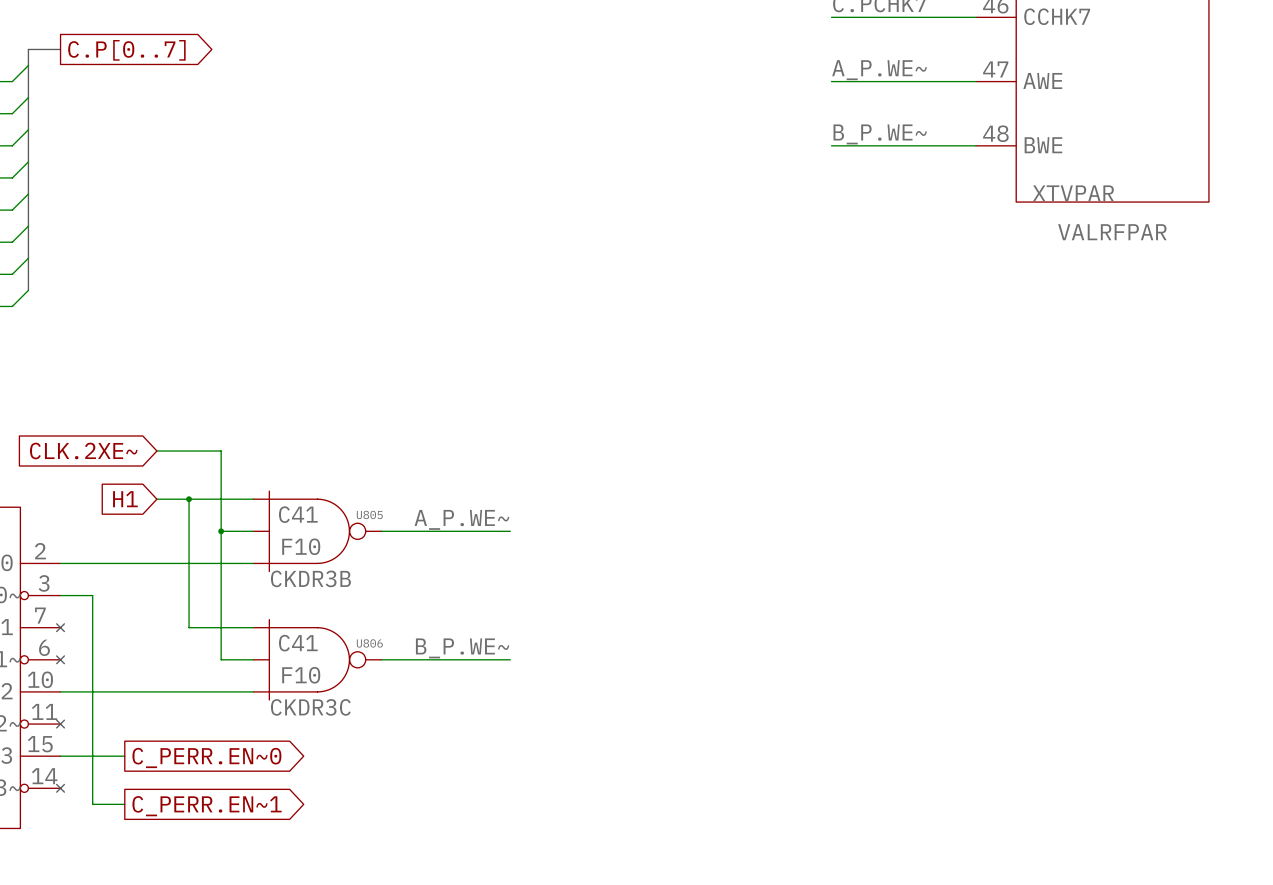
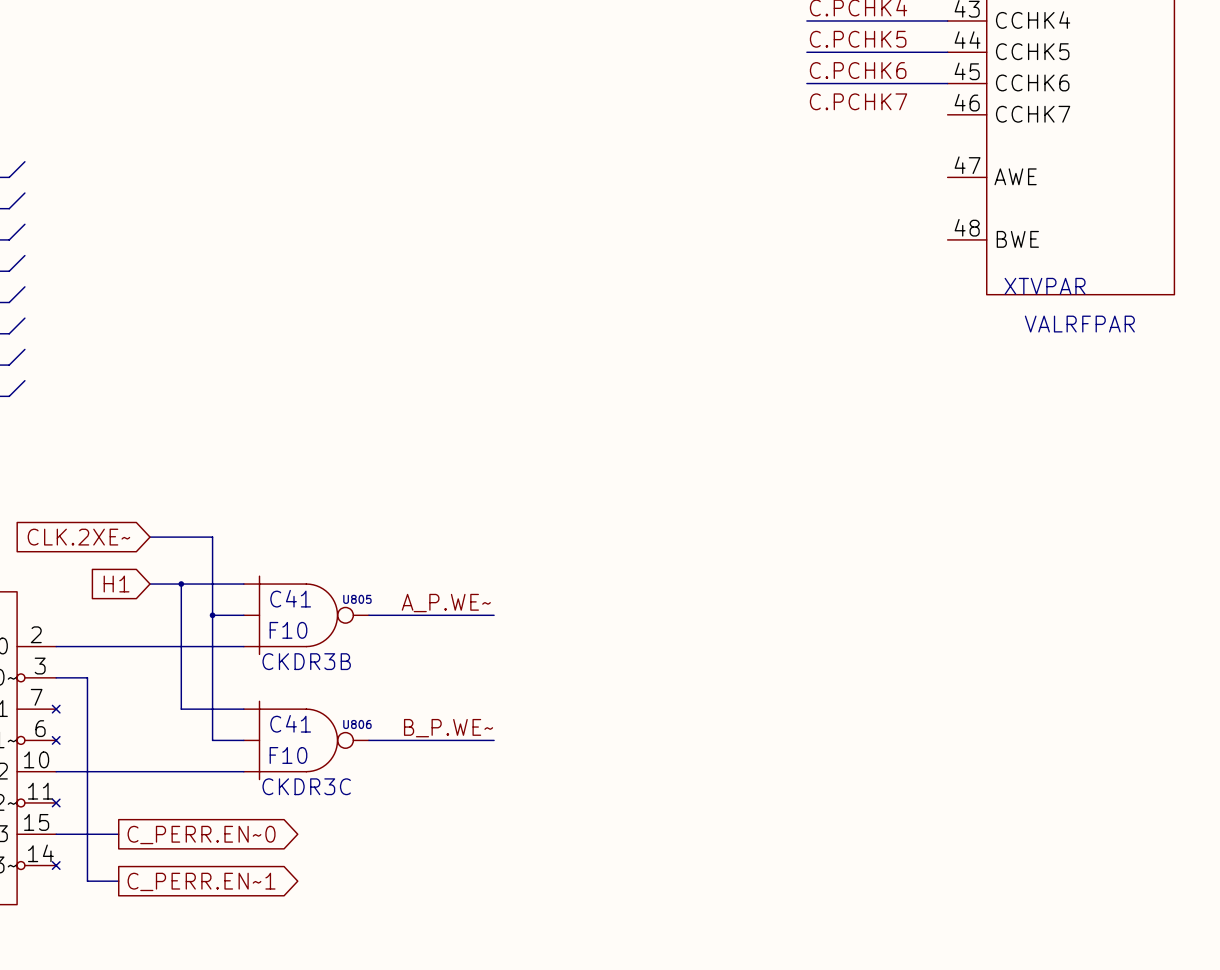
wire: (831, 17) (976, 17) -> none
bus: (60, 49) (28, 49) (28, 290) -> none
global label: C.P[0..7] (126, 50) -> none
label: A_P.WE~ (879, 70) -> none
wire: (831, 81) (976, 81) -> none
label: B_P.WE~ (880, 134) -> none
wire: (831, 145) (976, 145) -> none

